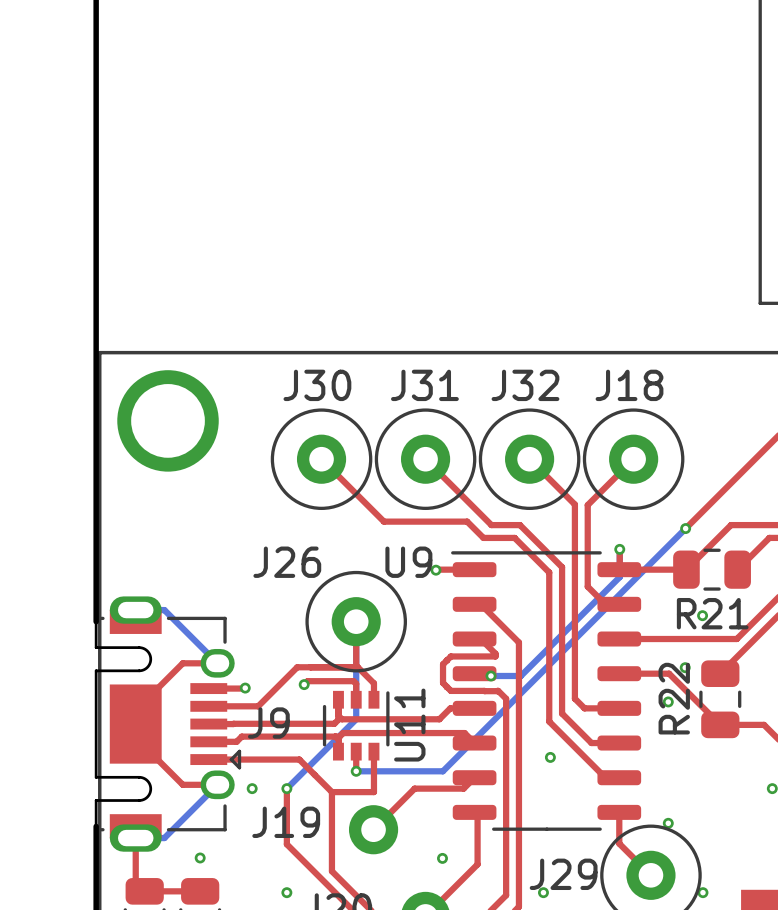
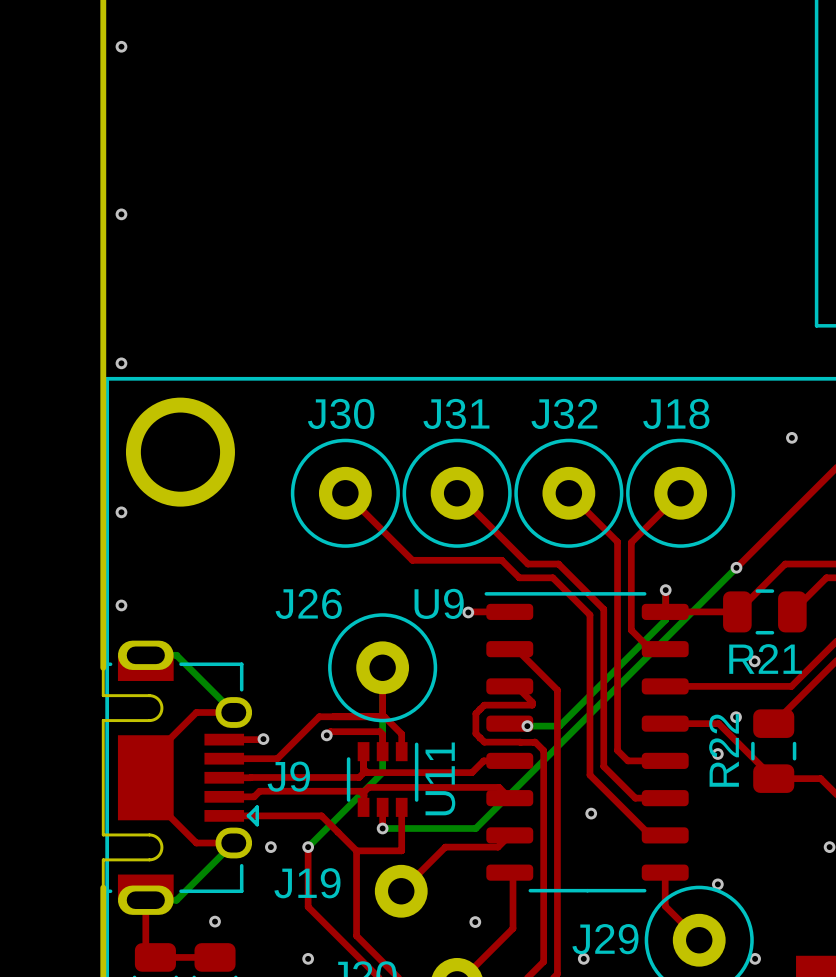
via: none -> (121, 46)
via: none -> (121, 214)
via: none -> (121, 363)
via: none -> (791, 437)
via: none -> (121, 512)
via: none -> (121, 605)

